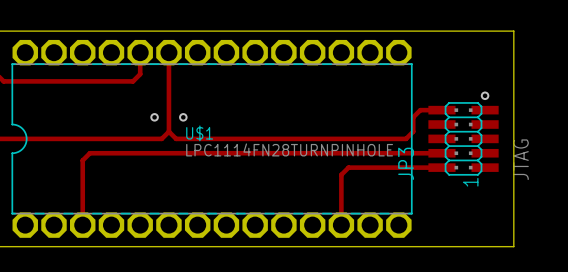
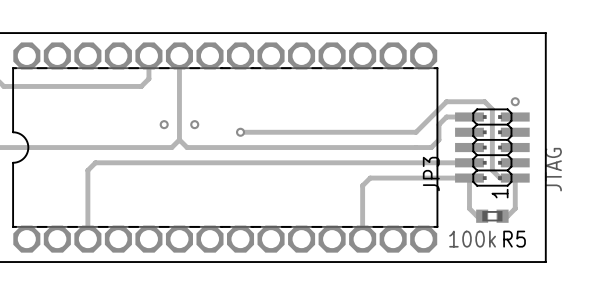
track: none -> (240, 132) (416, 132) (446, 101) (484, 101) (492, 109) (492, 170) (500, 178) (515, 178) (515, 208) (507, 216) (502, 216)
via: none -> (240, 132)
U$1 name: U$1 (199, 133) -> none
U$1 value: LPC1114FN28TURNPINHOLE (289, 149) -> none
track: none -> (469, 178) (469, 208) (477, 216) (482, 216)
R5: none -> 100k (492, 216)

